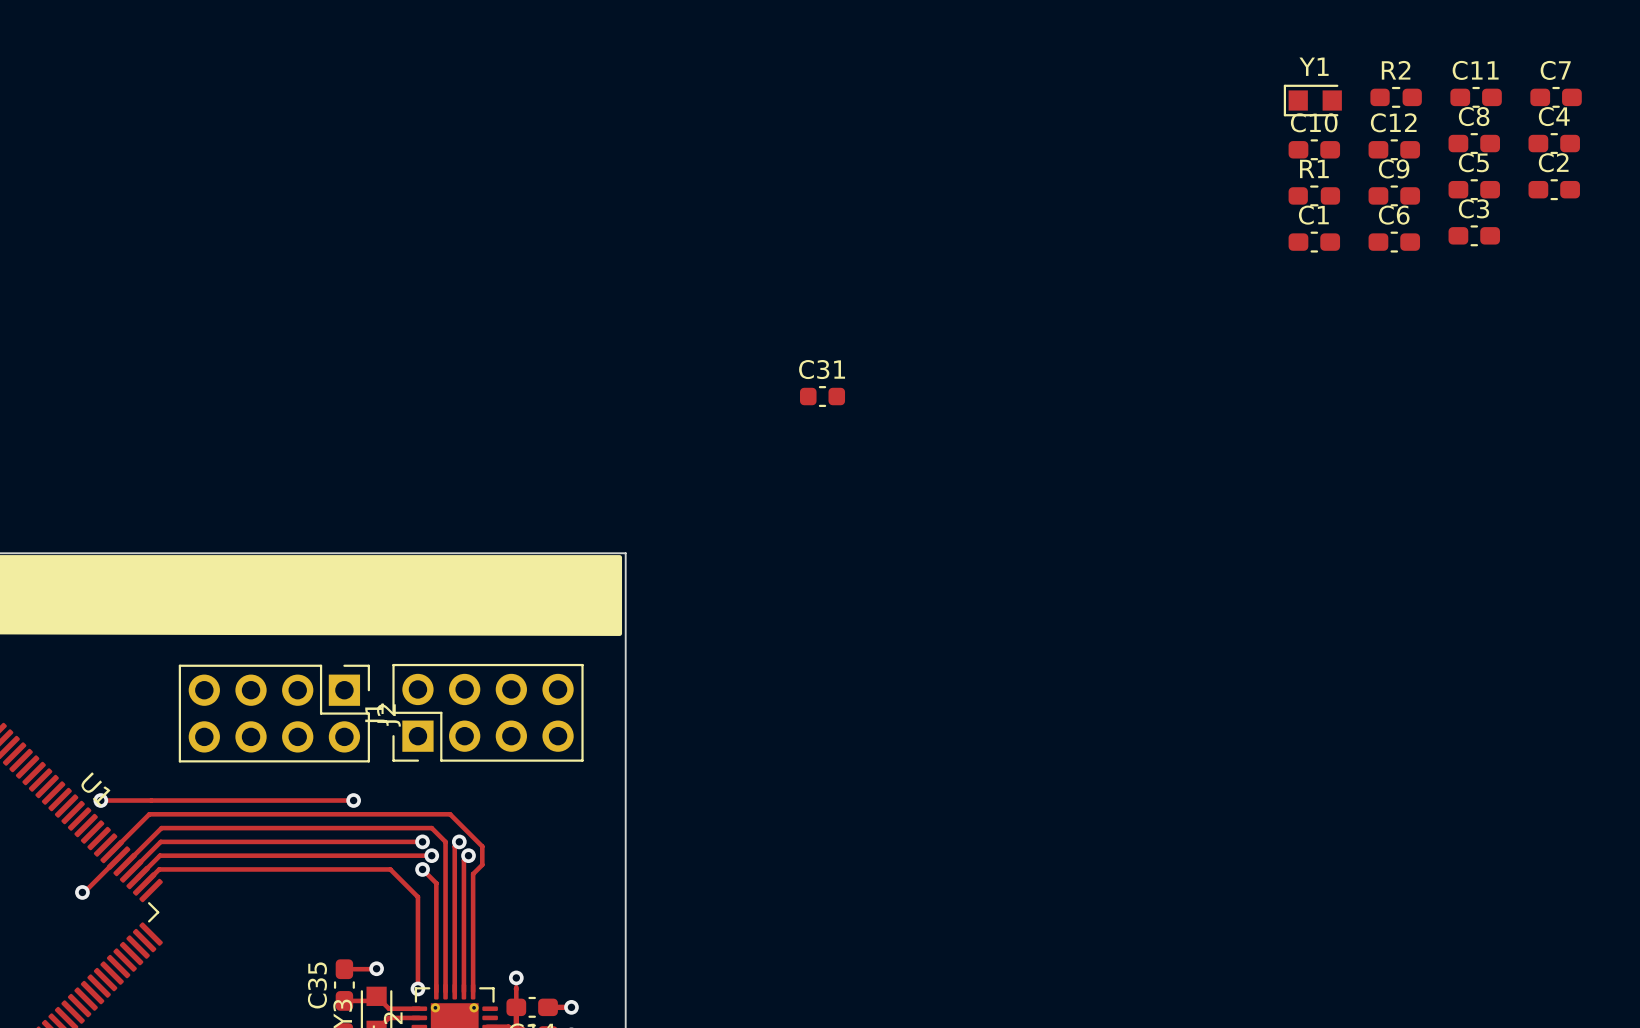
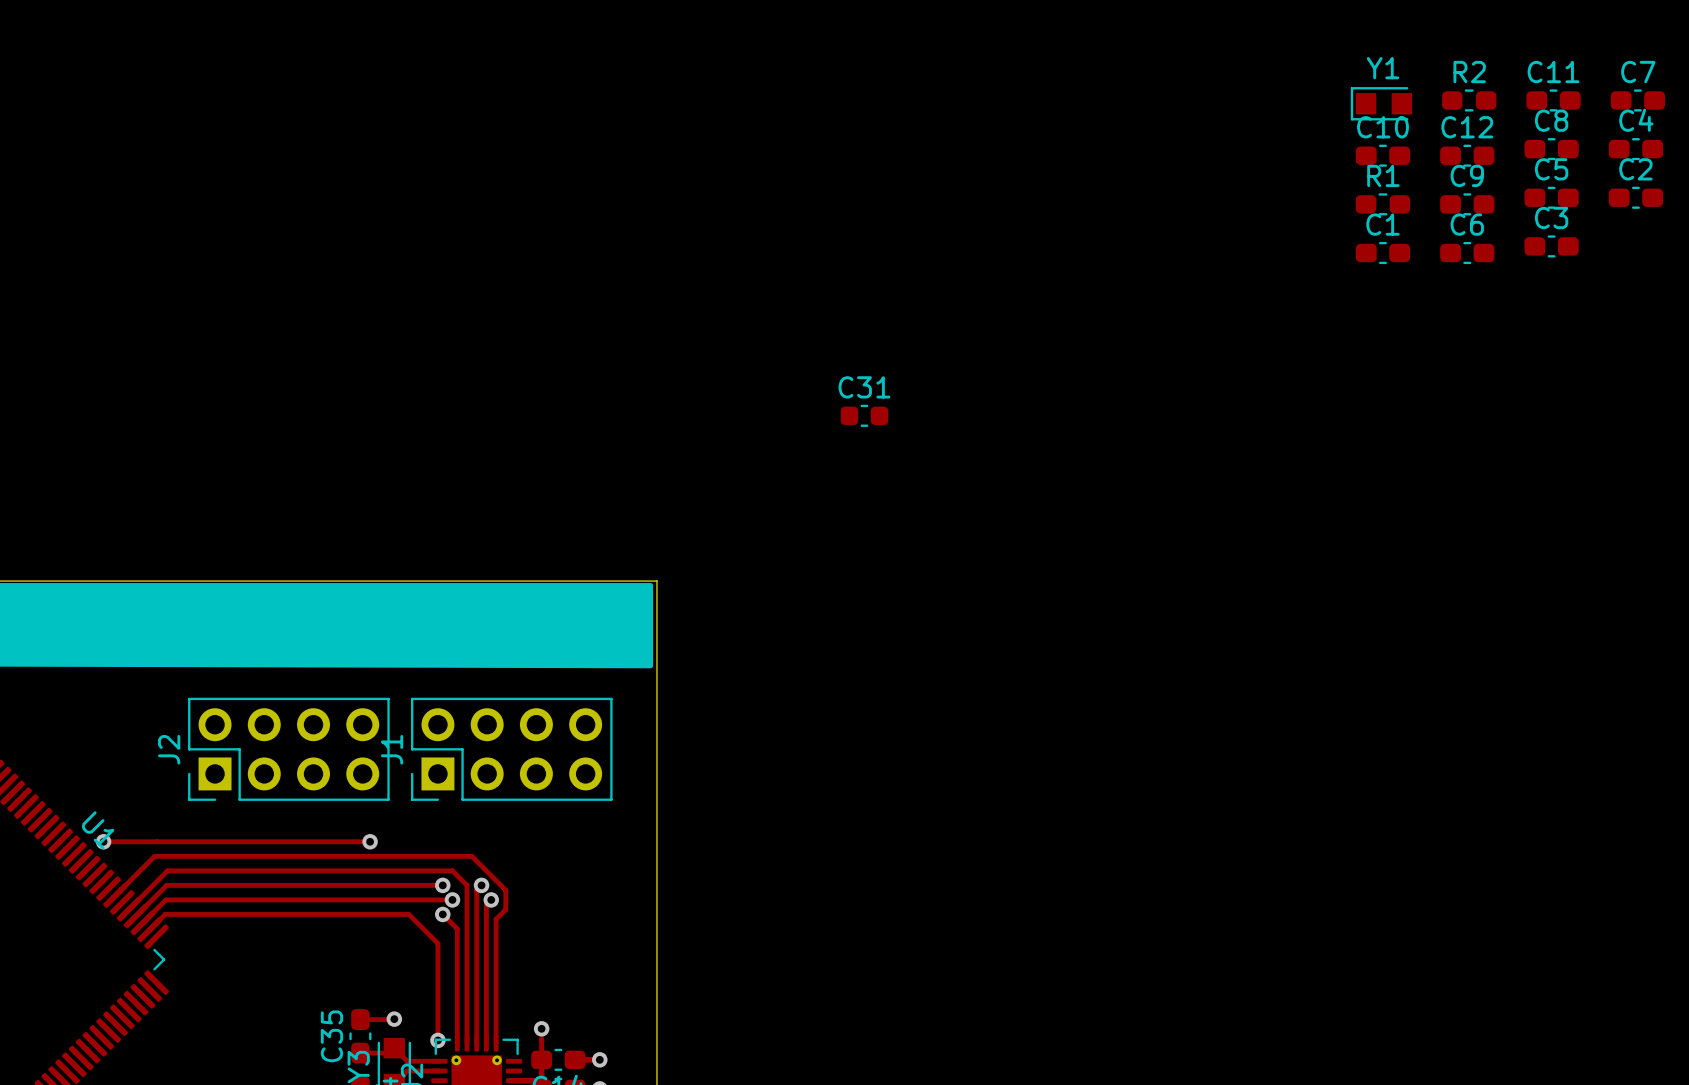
J2 rotation: 0° (274, 713) -> 180° (288, 749)
track: (118, 858) (82, 892) -> none
via: (82, 892) -> none

